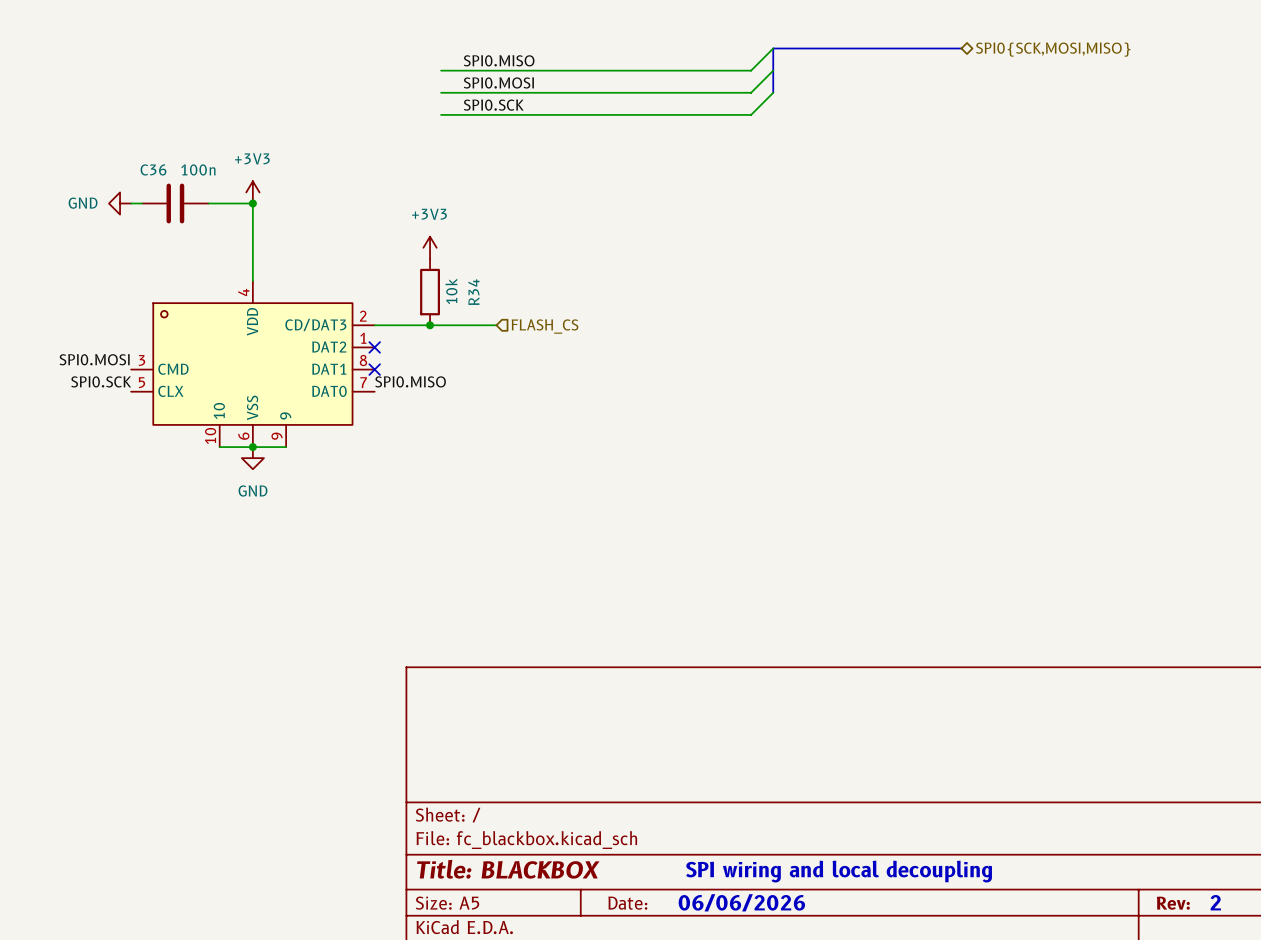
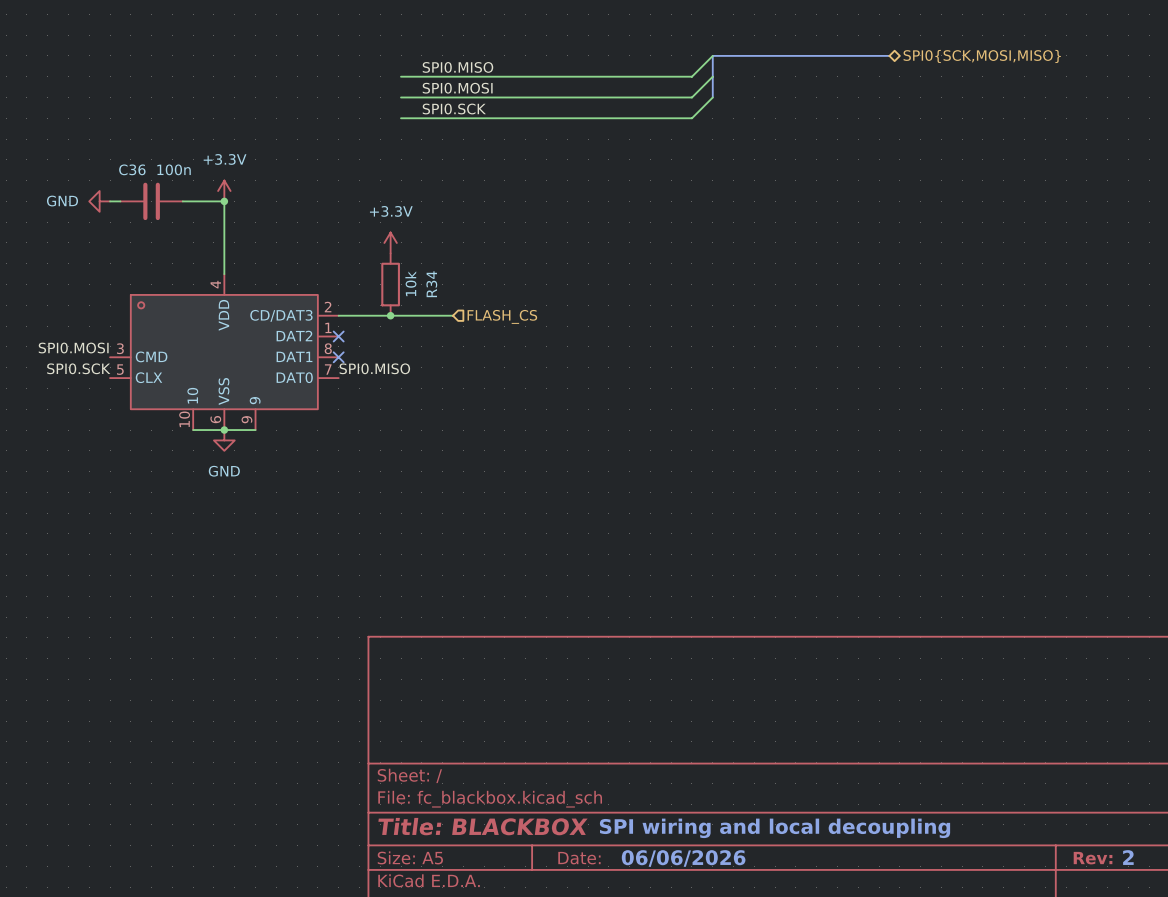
power symbol: +3V3 (252, 192) -> +3.3V (224, 191)
power symbol: +3V3 (430, 247) -> +3.3V (390, 242)

